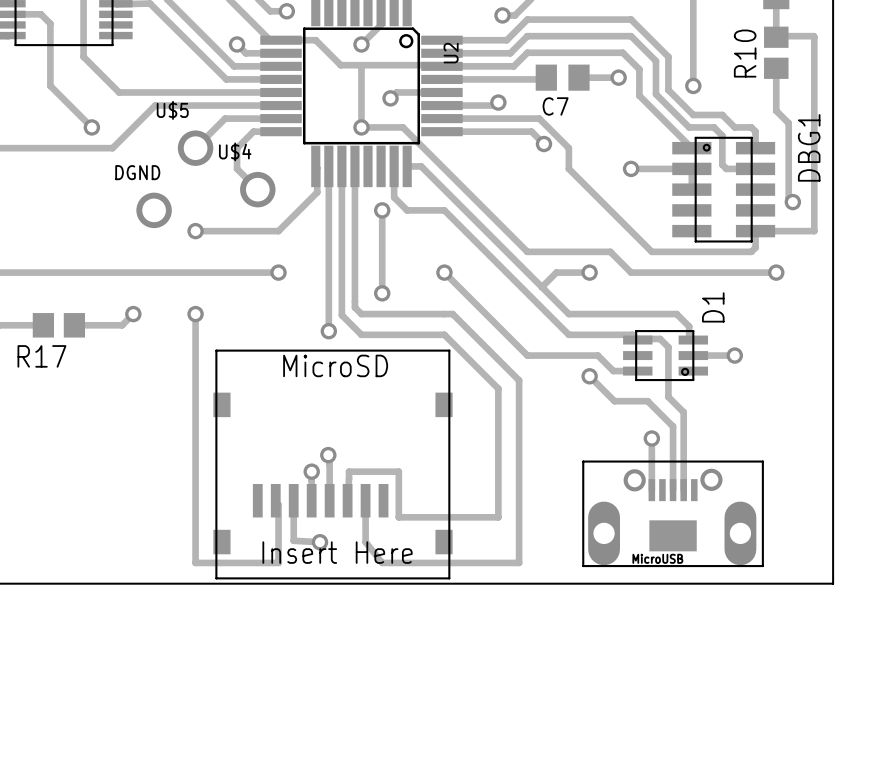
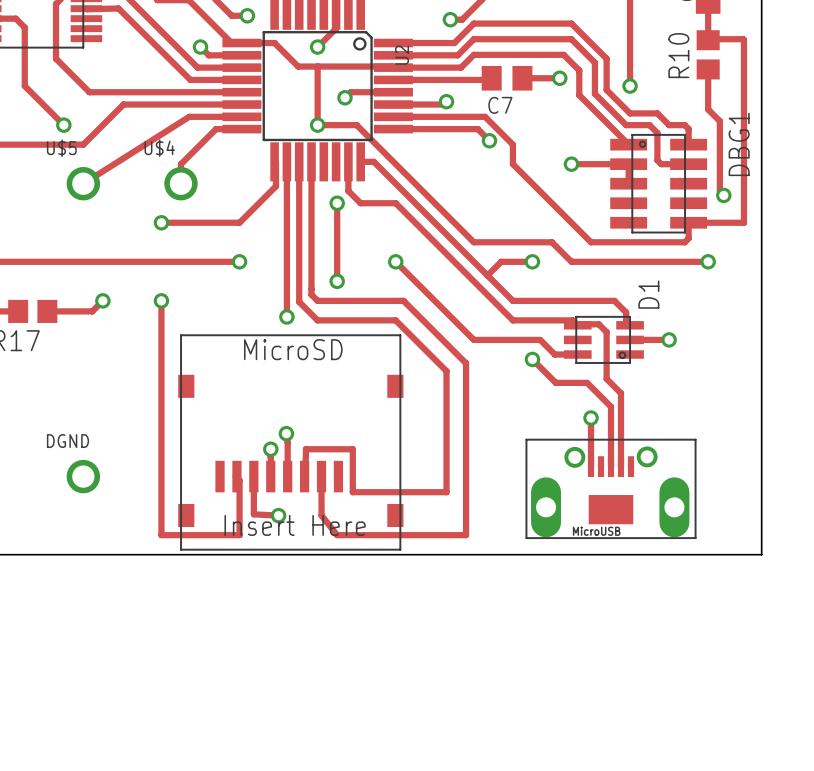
track: (225, 118) (195, 148) -> (189, 116) (83, 183)
U$5 position: (195, 148) -> (83, 183)
track: (237, 148) (237, 168) (257, 189) -> (200, 144) (180, 164) (180, 183)
U$4 position: (257, 189) -> (180, 183)
DGND position: (154, 210) -> (83, 476)

